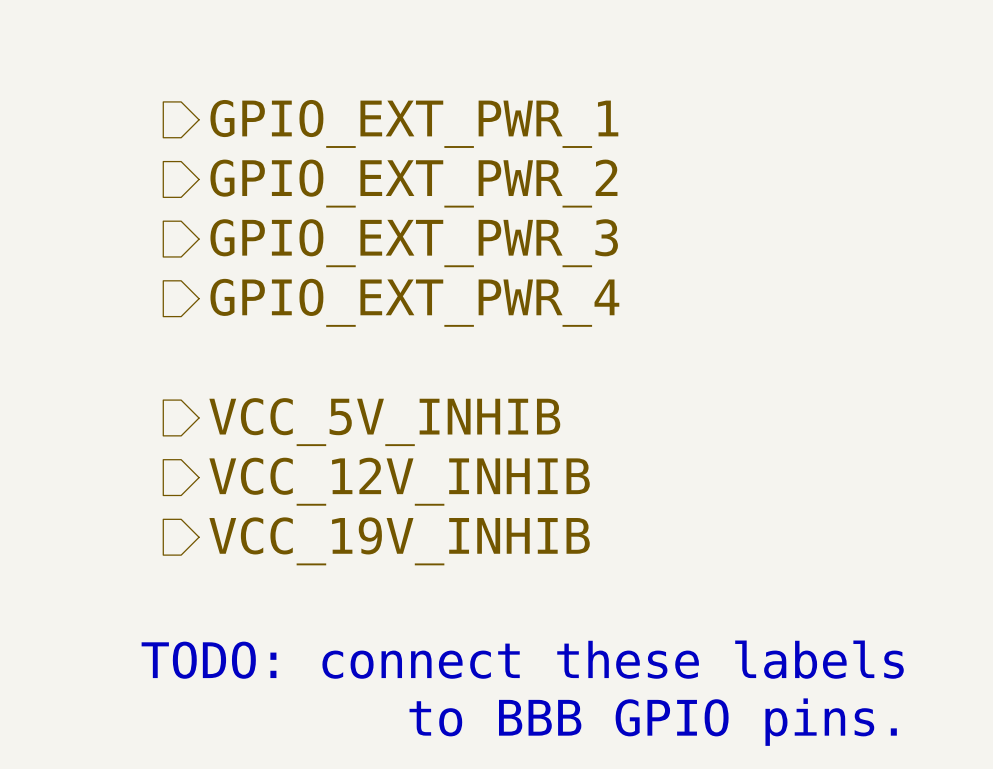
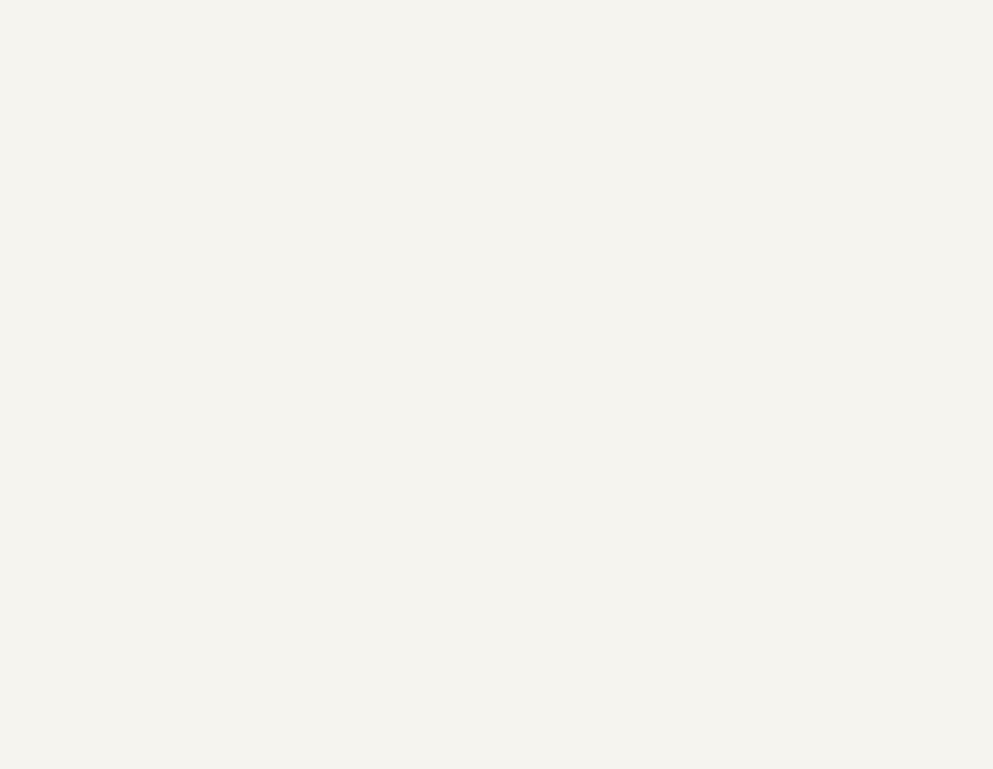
hierarchical label: GPIO_EXT_PWR_1 (414, 123) -> none
hierarchical label: GPIO_EXT_PWR_2 (413, 183) -> none
hierarchical label: GPIO_EXT_PWR_3 (414, 243) -> none
hierarchical label: GPIO_EXT_PWR_4 (414, 302) -> none
hierarchical label: VCC_5V_INHIB (384, 422) -> none
hierarchical label: VCC_12V_INHIB (399, 481) -> none
hierarchical label: VCC_19V_INHIB (399, 541) -> none
text: TODO: connect these labels (522, 659) -> none
text: to BBB GPIO pins. (653, 722) -> none

